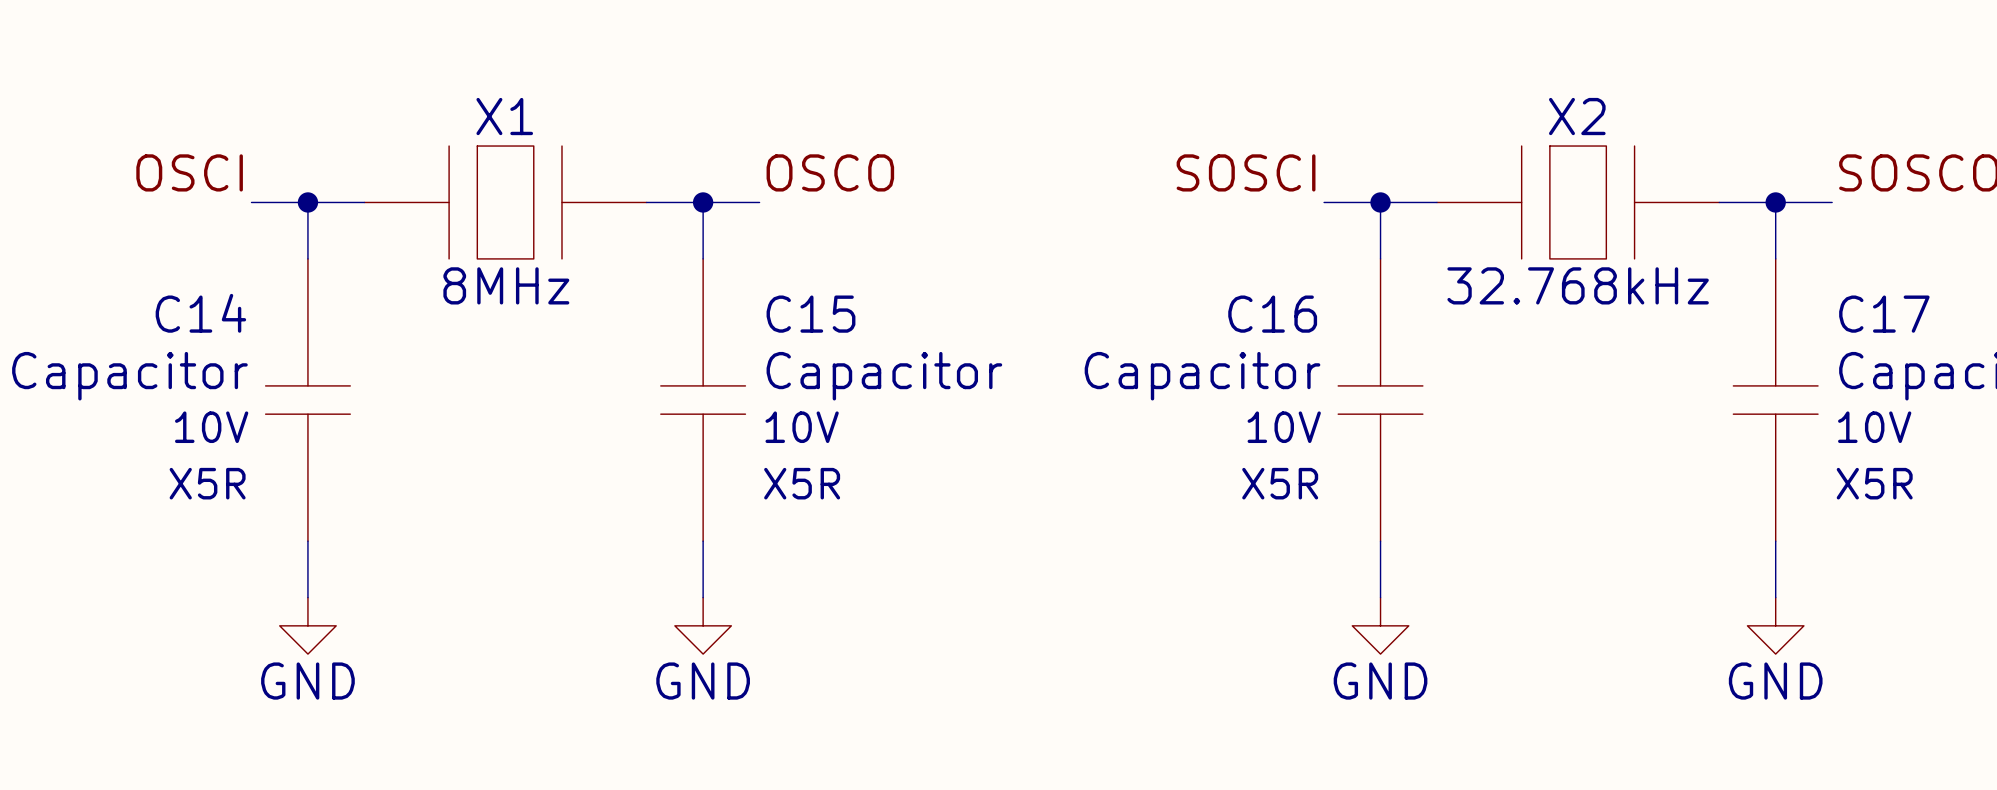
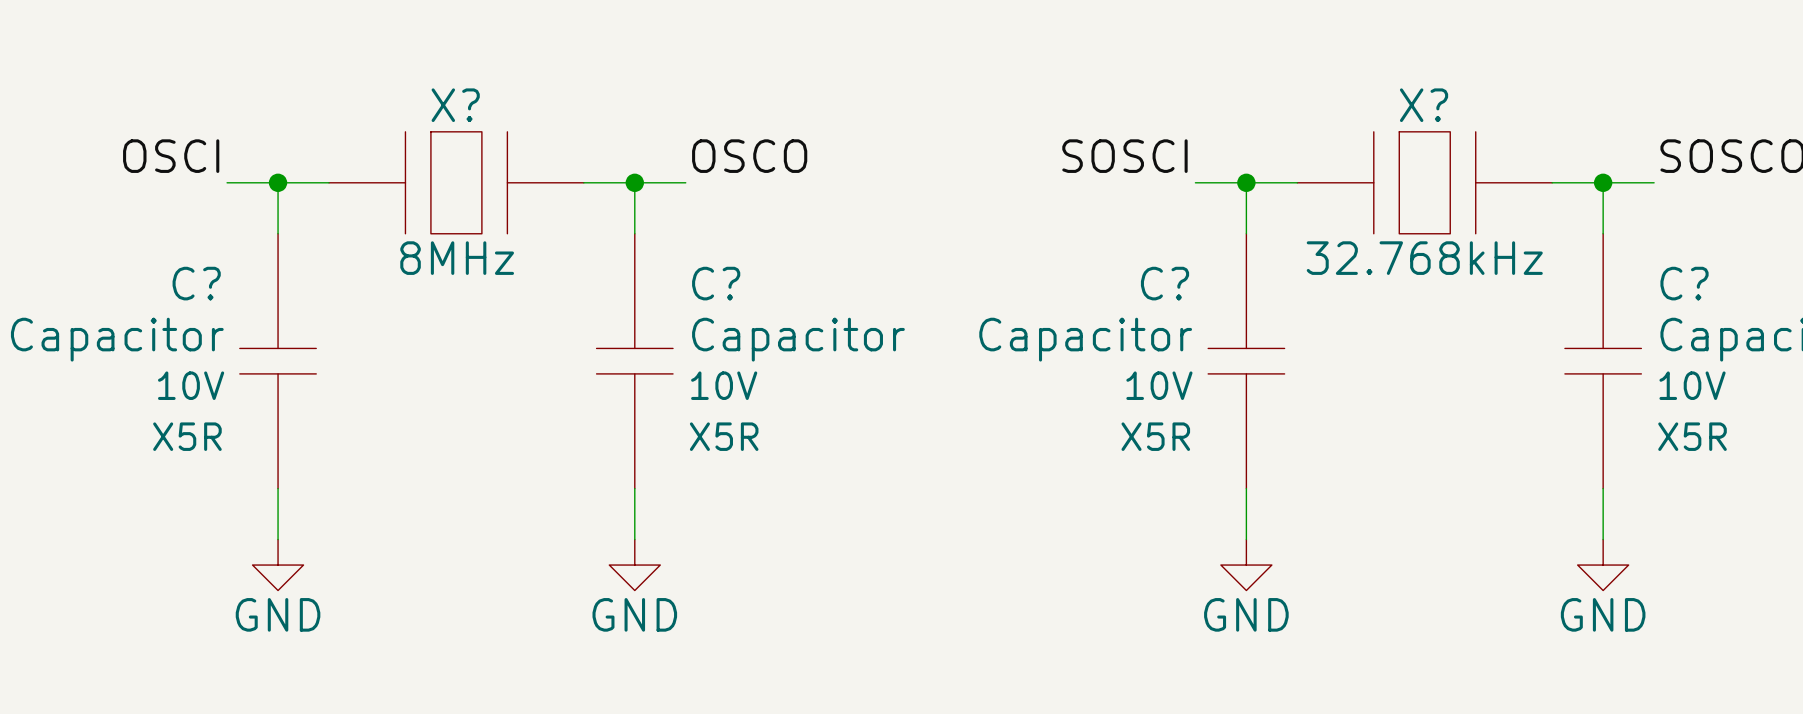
X1 name: X1 (504, 116) -> X? (455, 105)
X2 name: X2 (1577, 116) -> X? (1424, 105)
C14 name: C14 (200, 313) -> C? (196, 283)
C15 name: C15 (810, 314) -> C? (716, 283)
C16 name: C16 (1272, 314) -> C? (1165, 283)
C17 name: C17 (1884, 314) -> C? (1684, 283)

